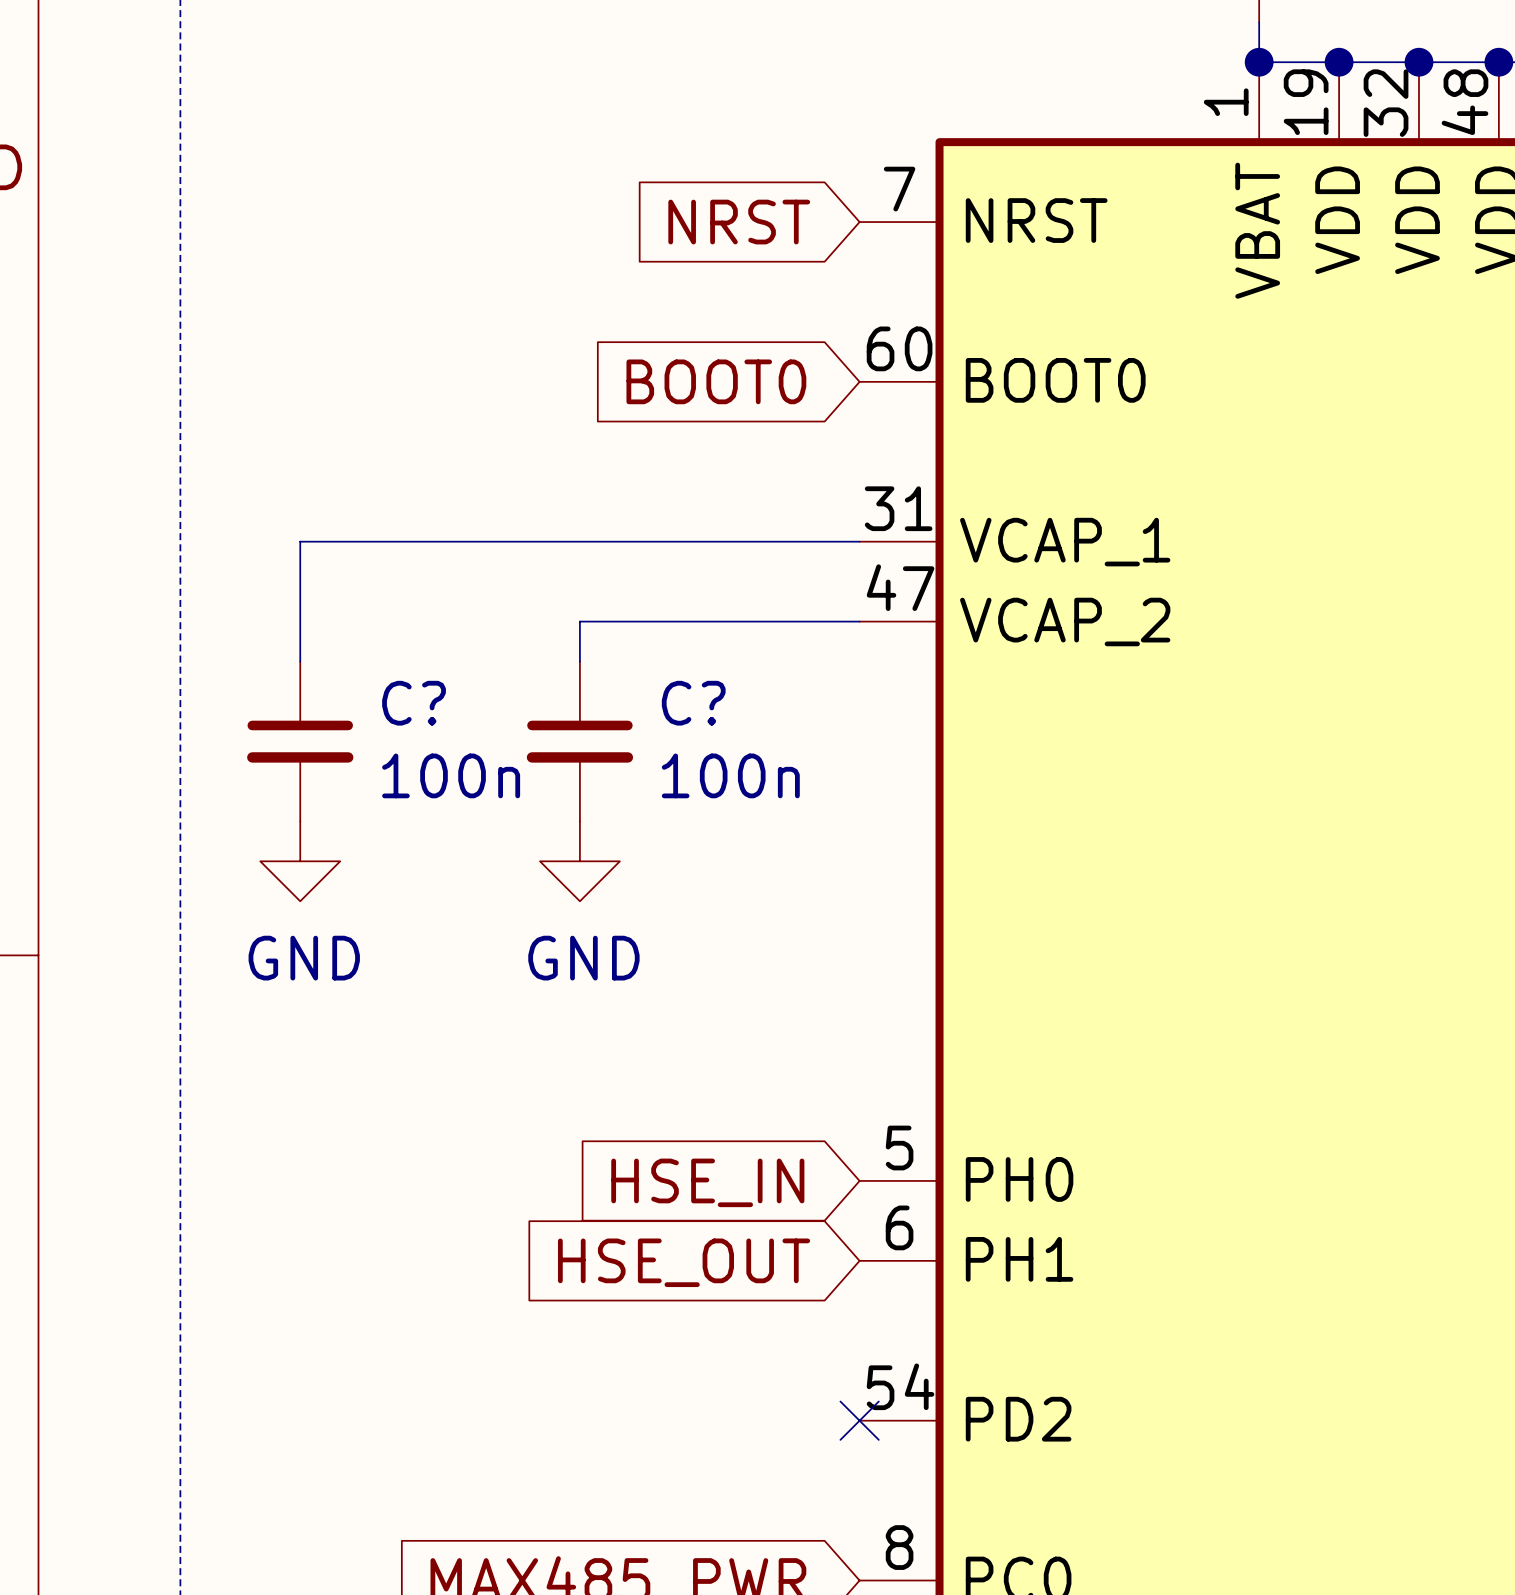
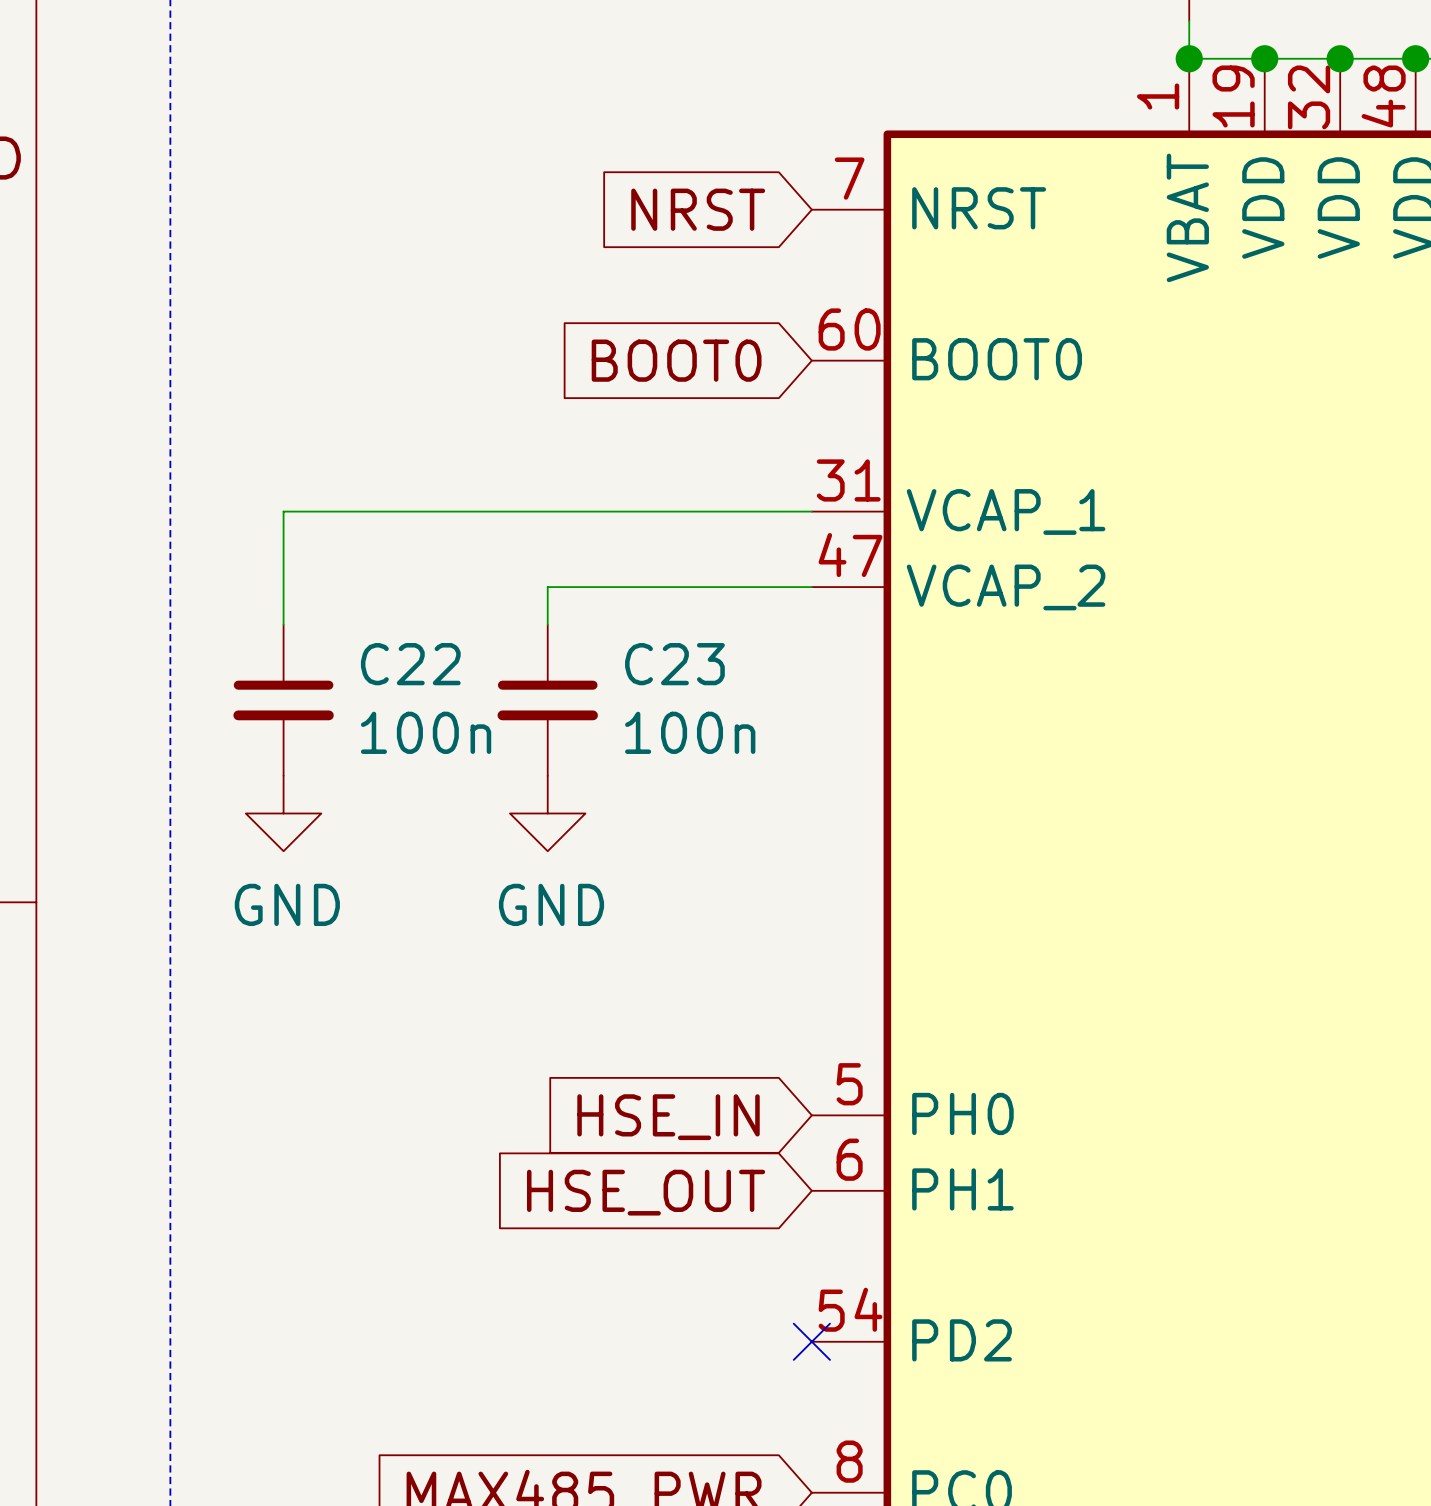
C? name: C? (414, 703) -> C22 (410, 664)
C? name: C? (693, 703) -> C23 (674, 664)

